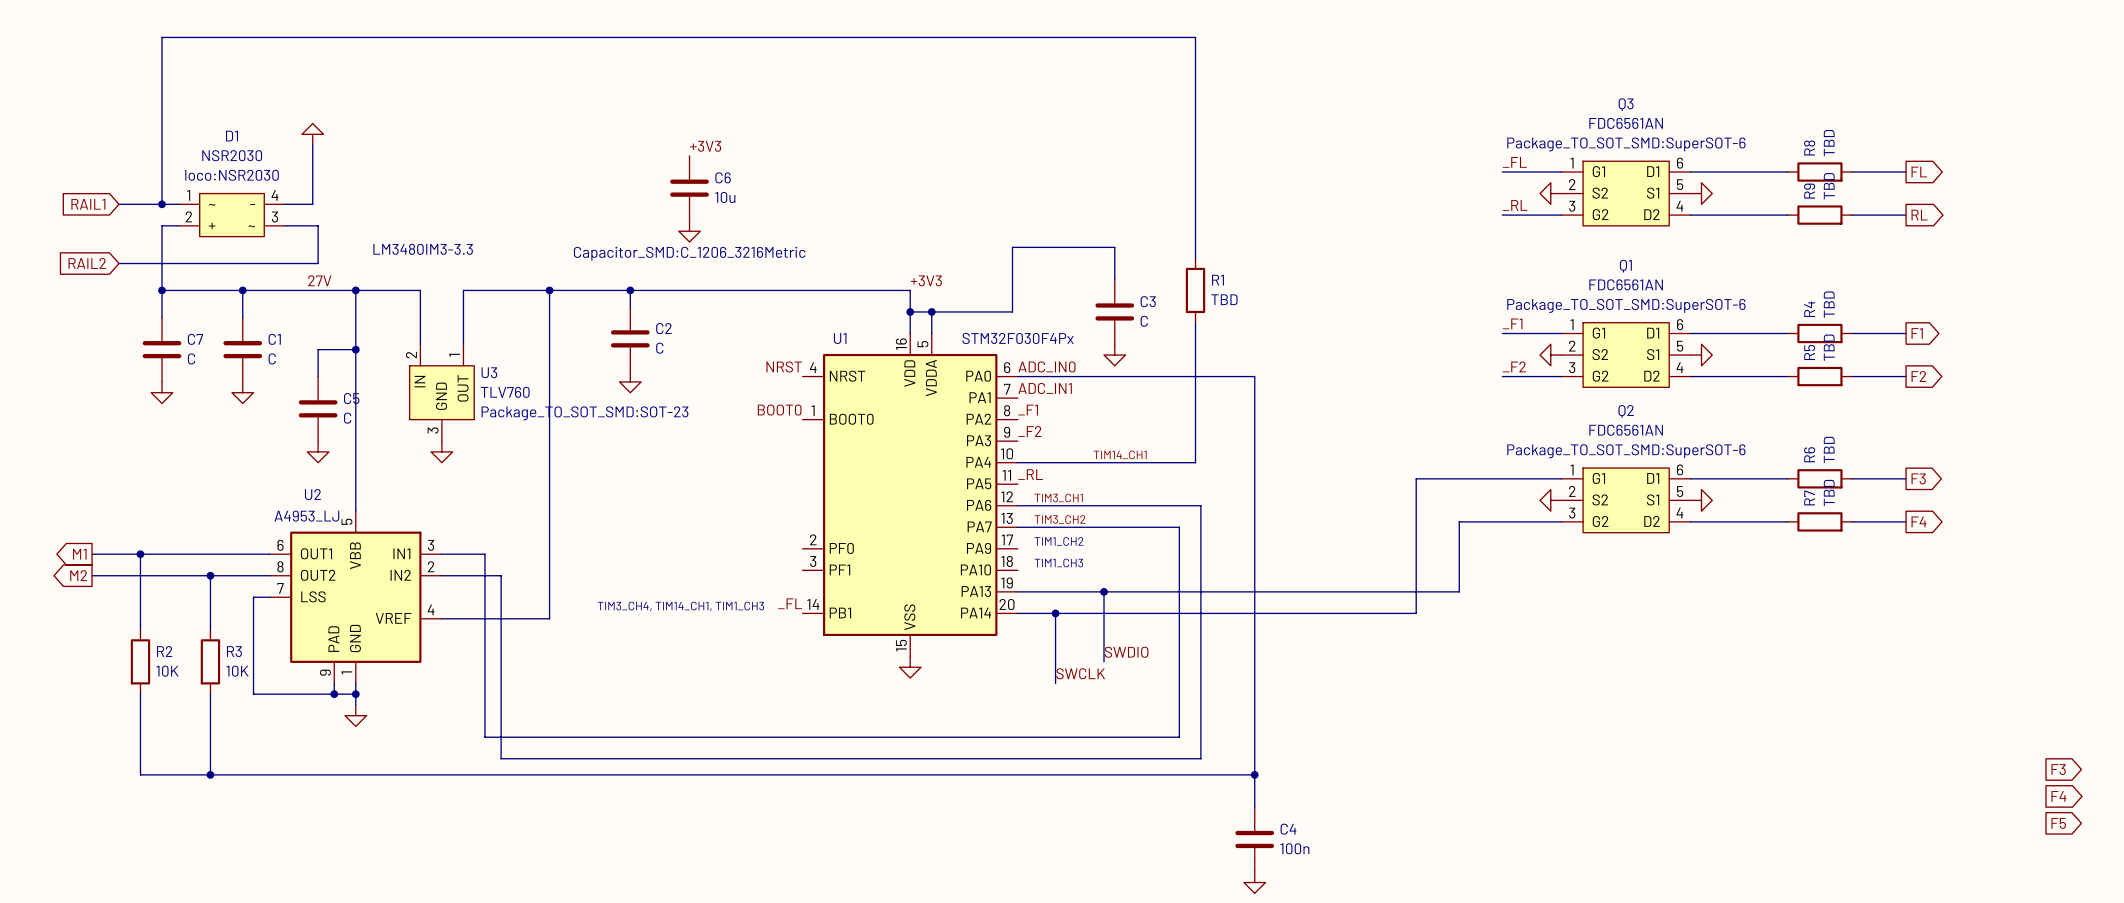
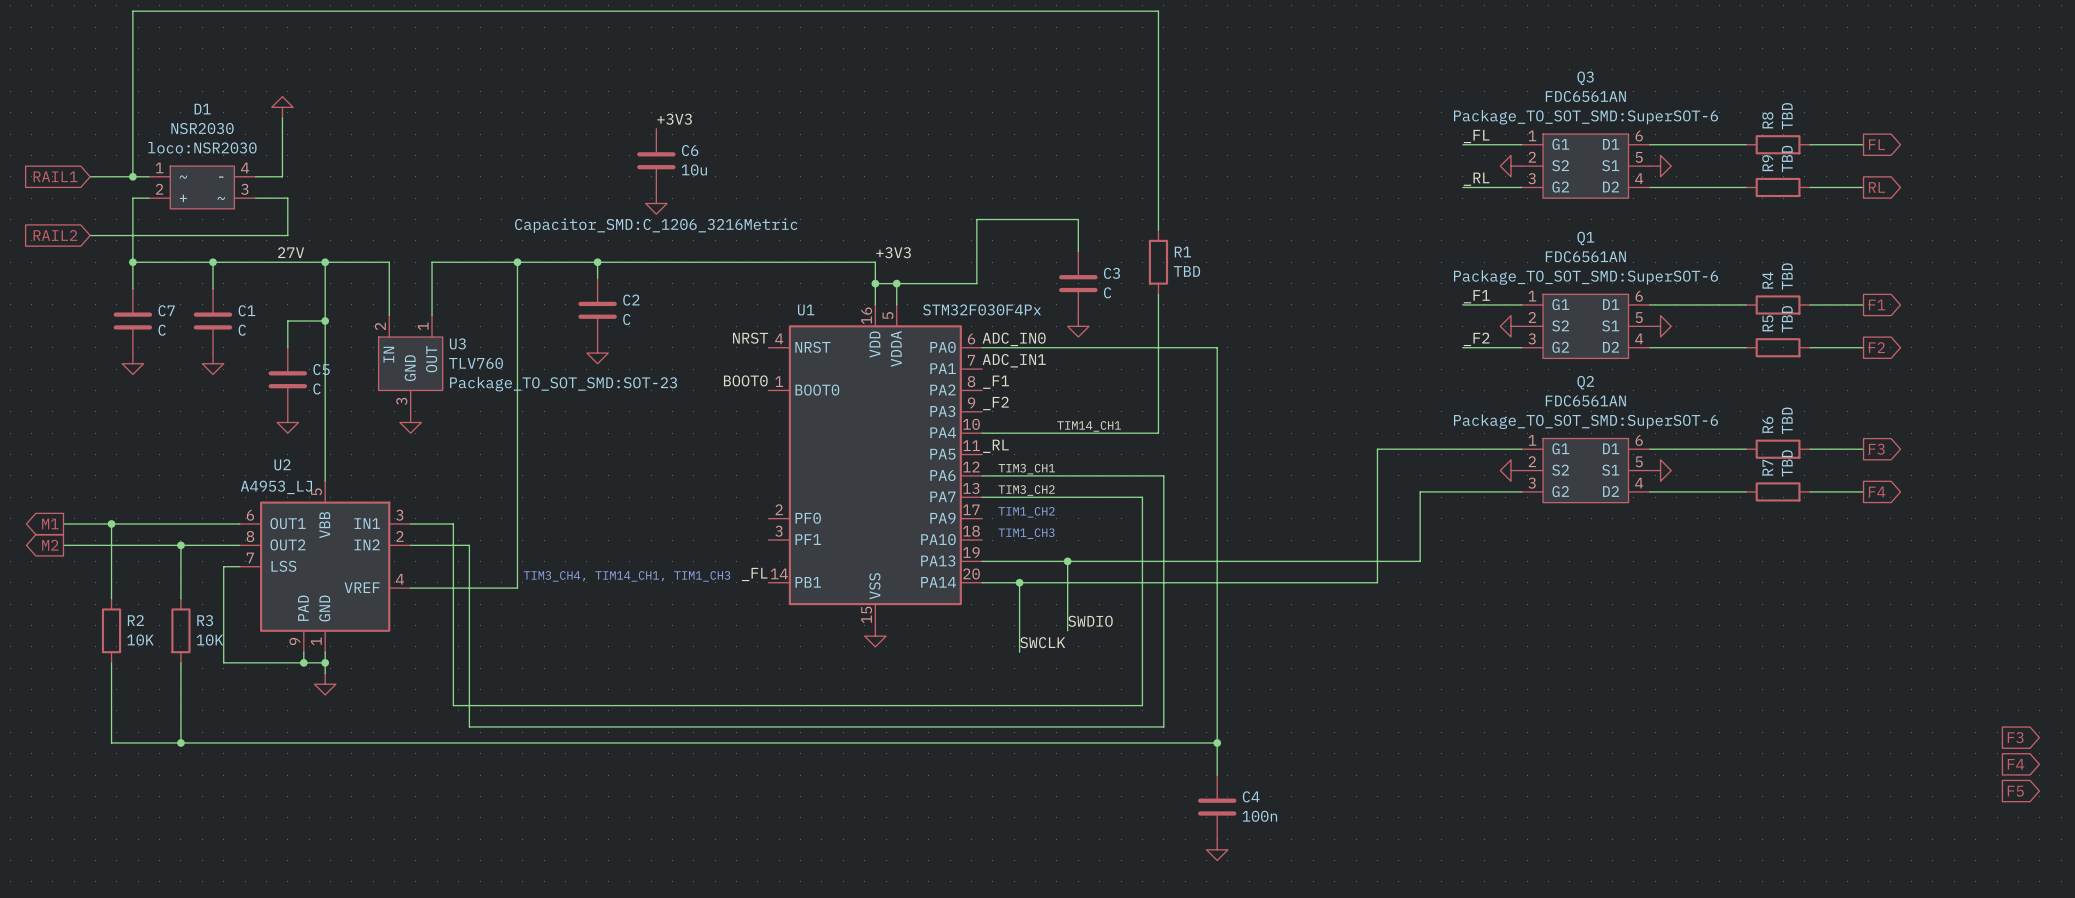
text: LM3480IM3-3.3 (423, 249) -> none

